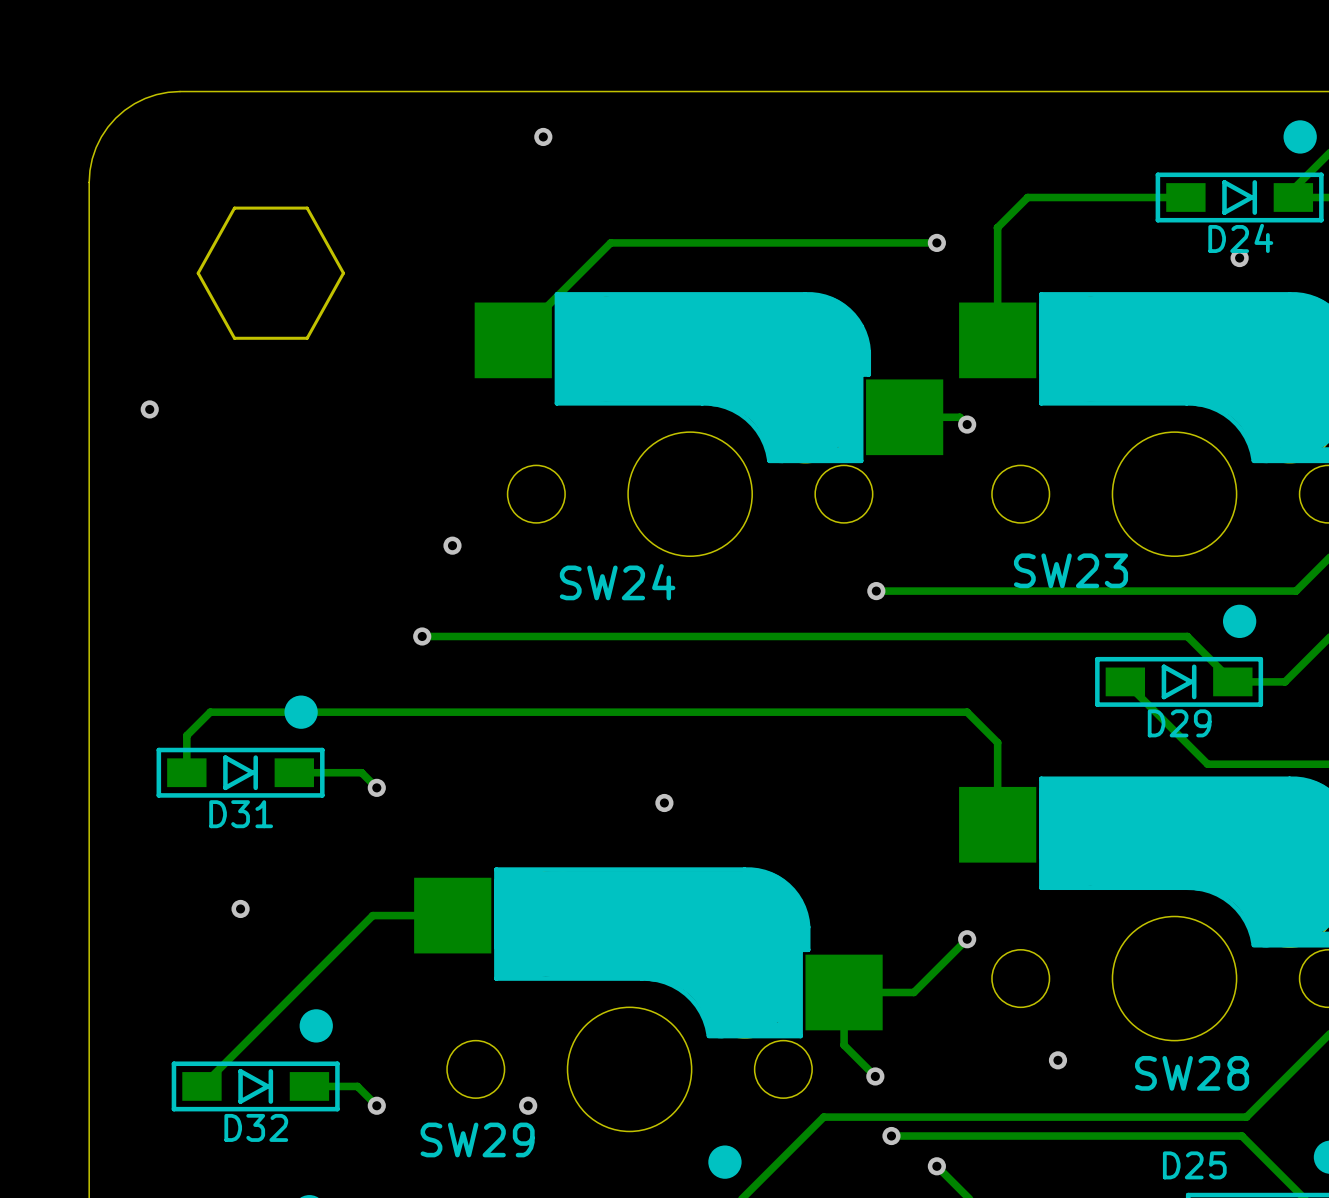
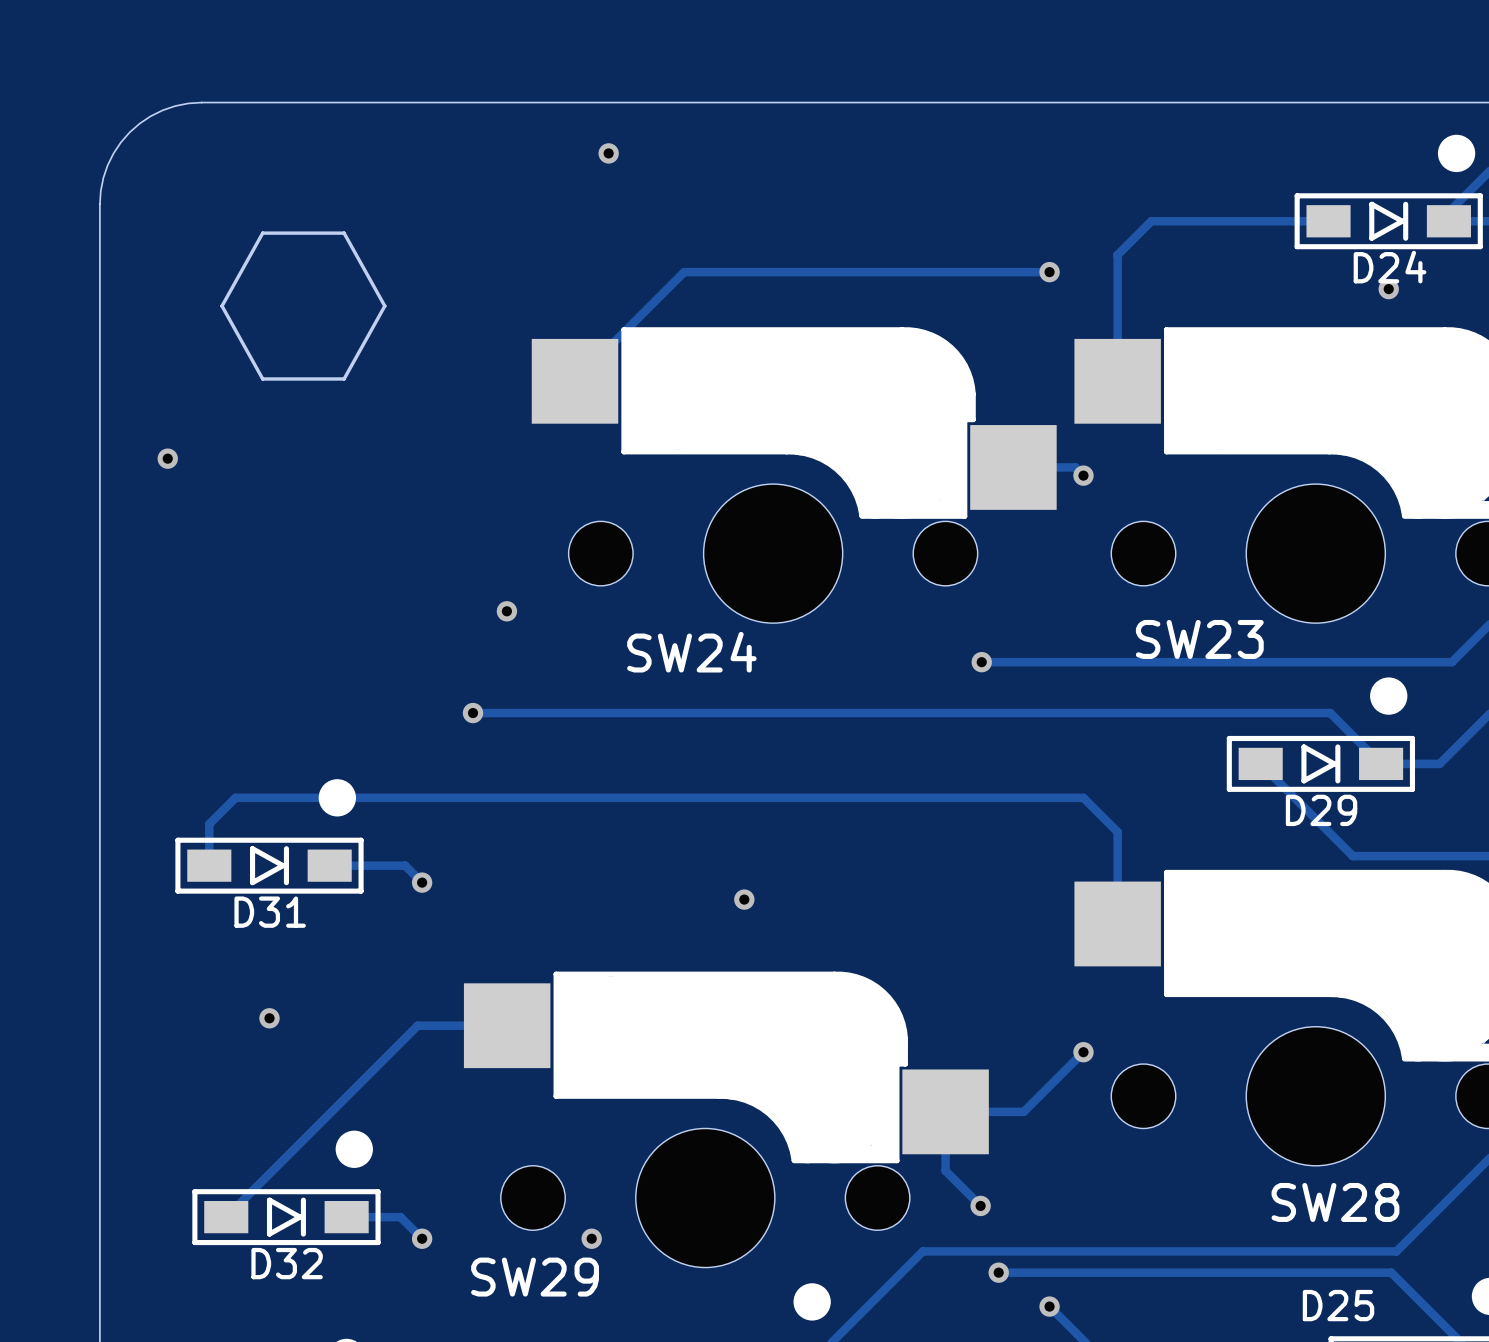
via: (1057, 1060) -> none

